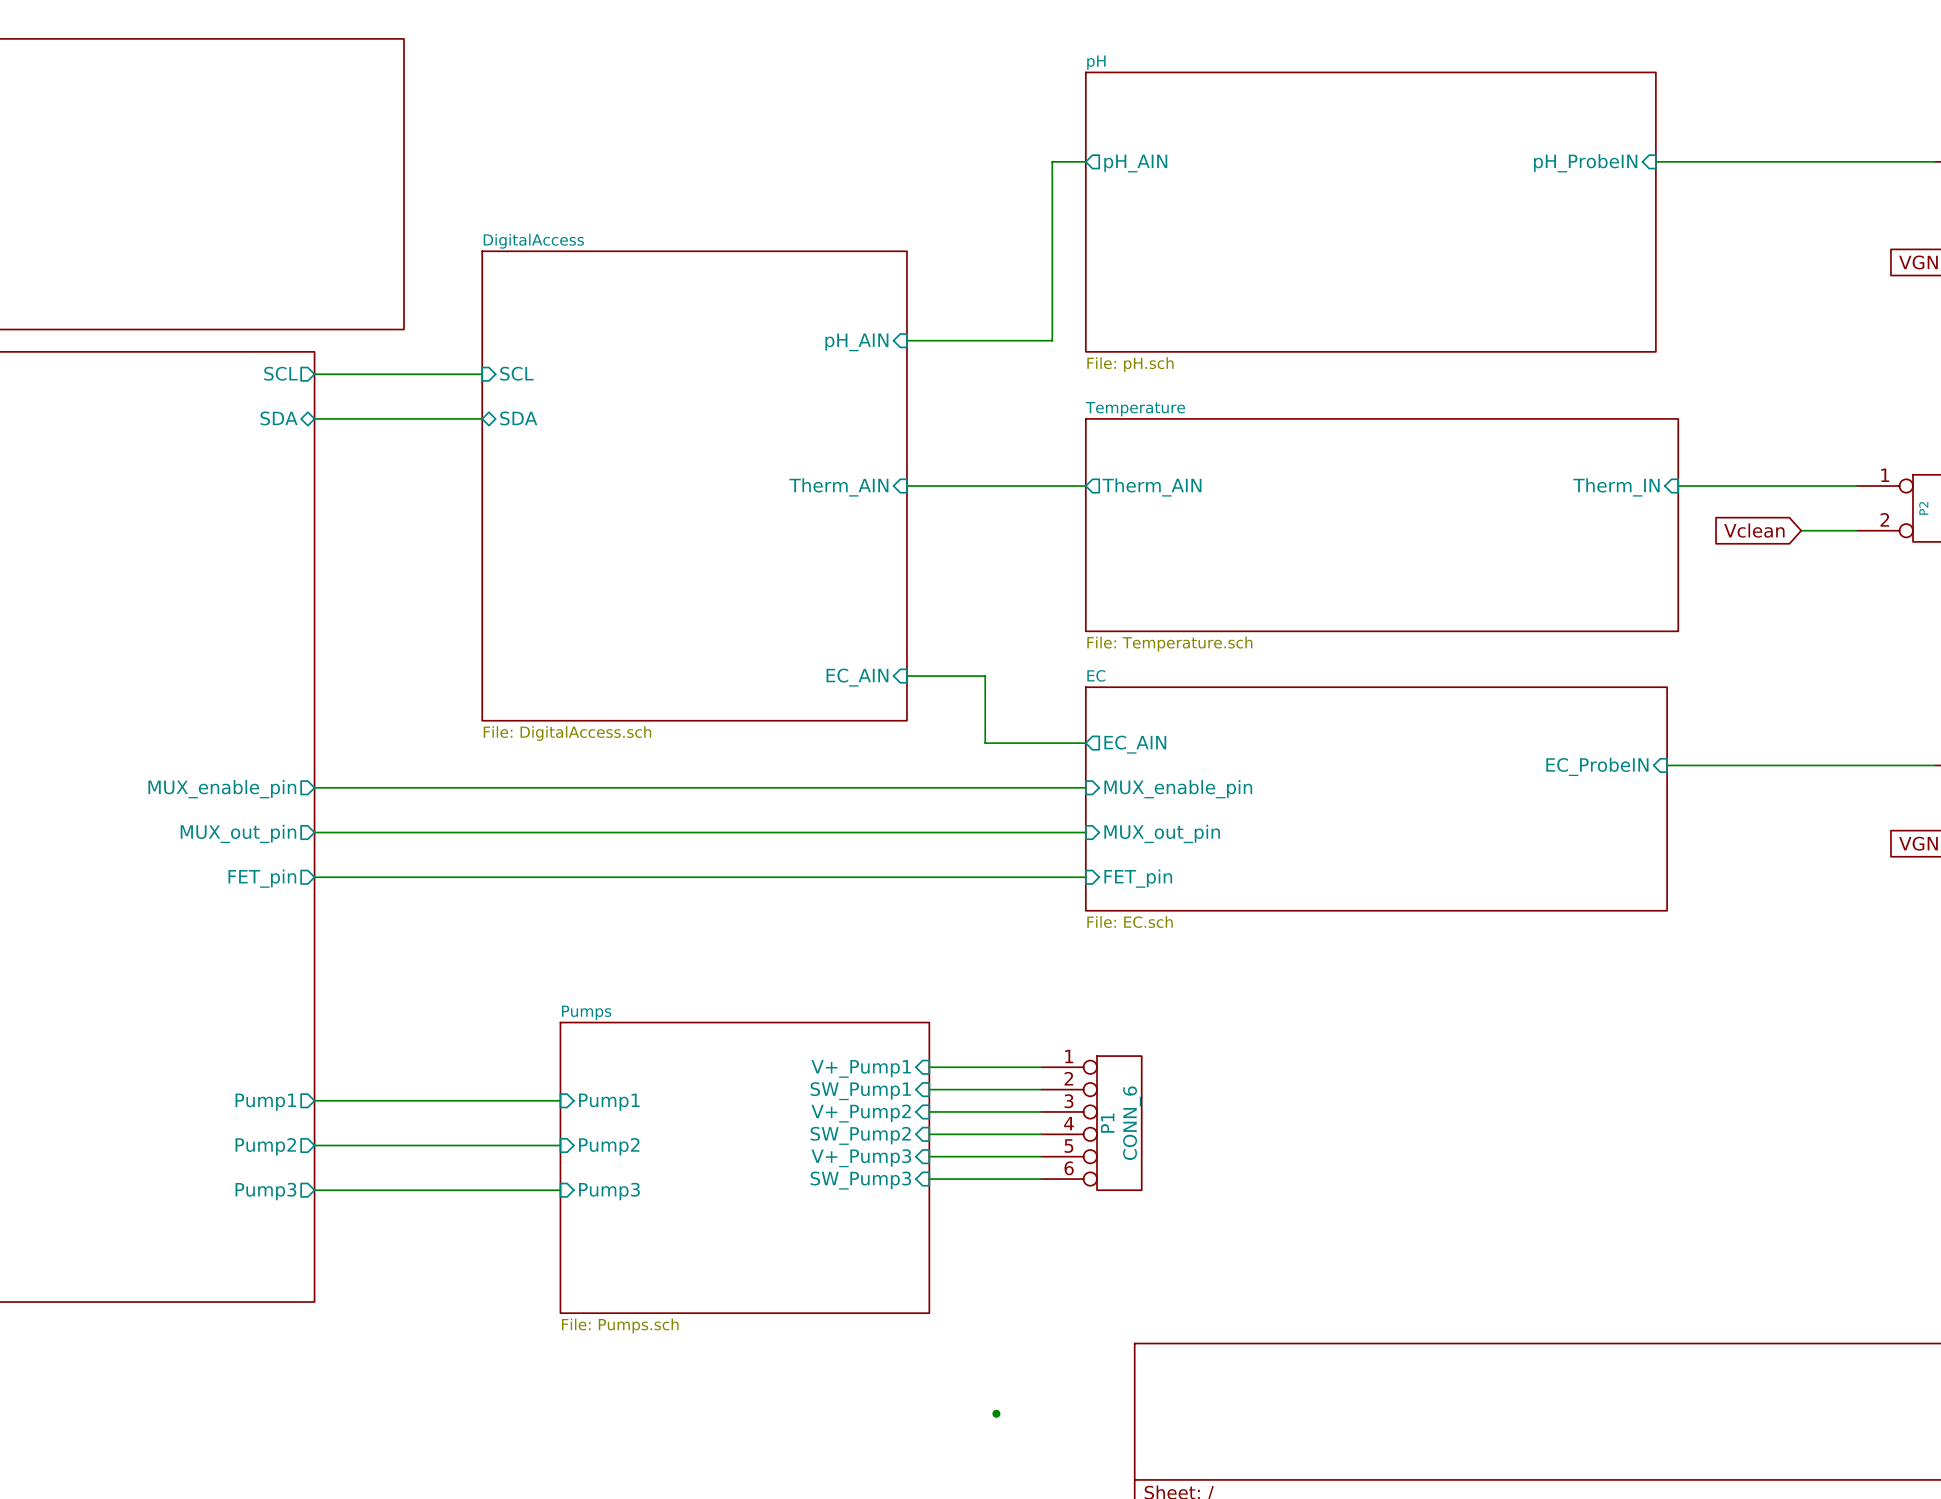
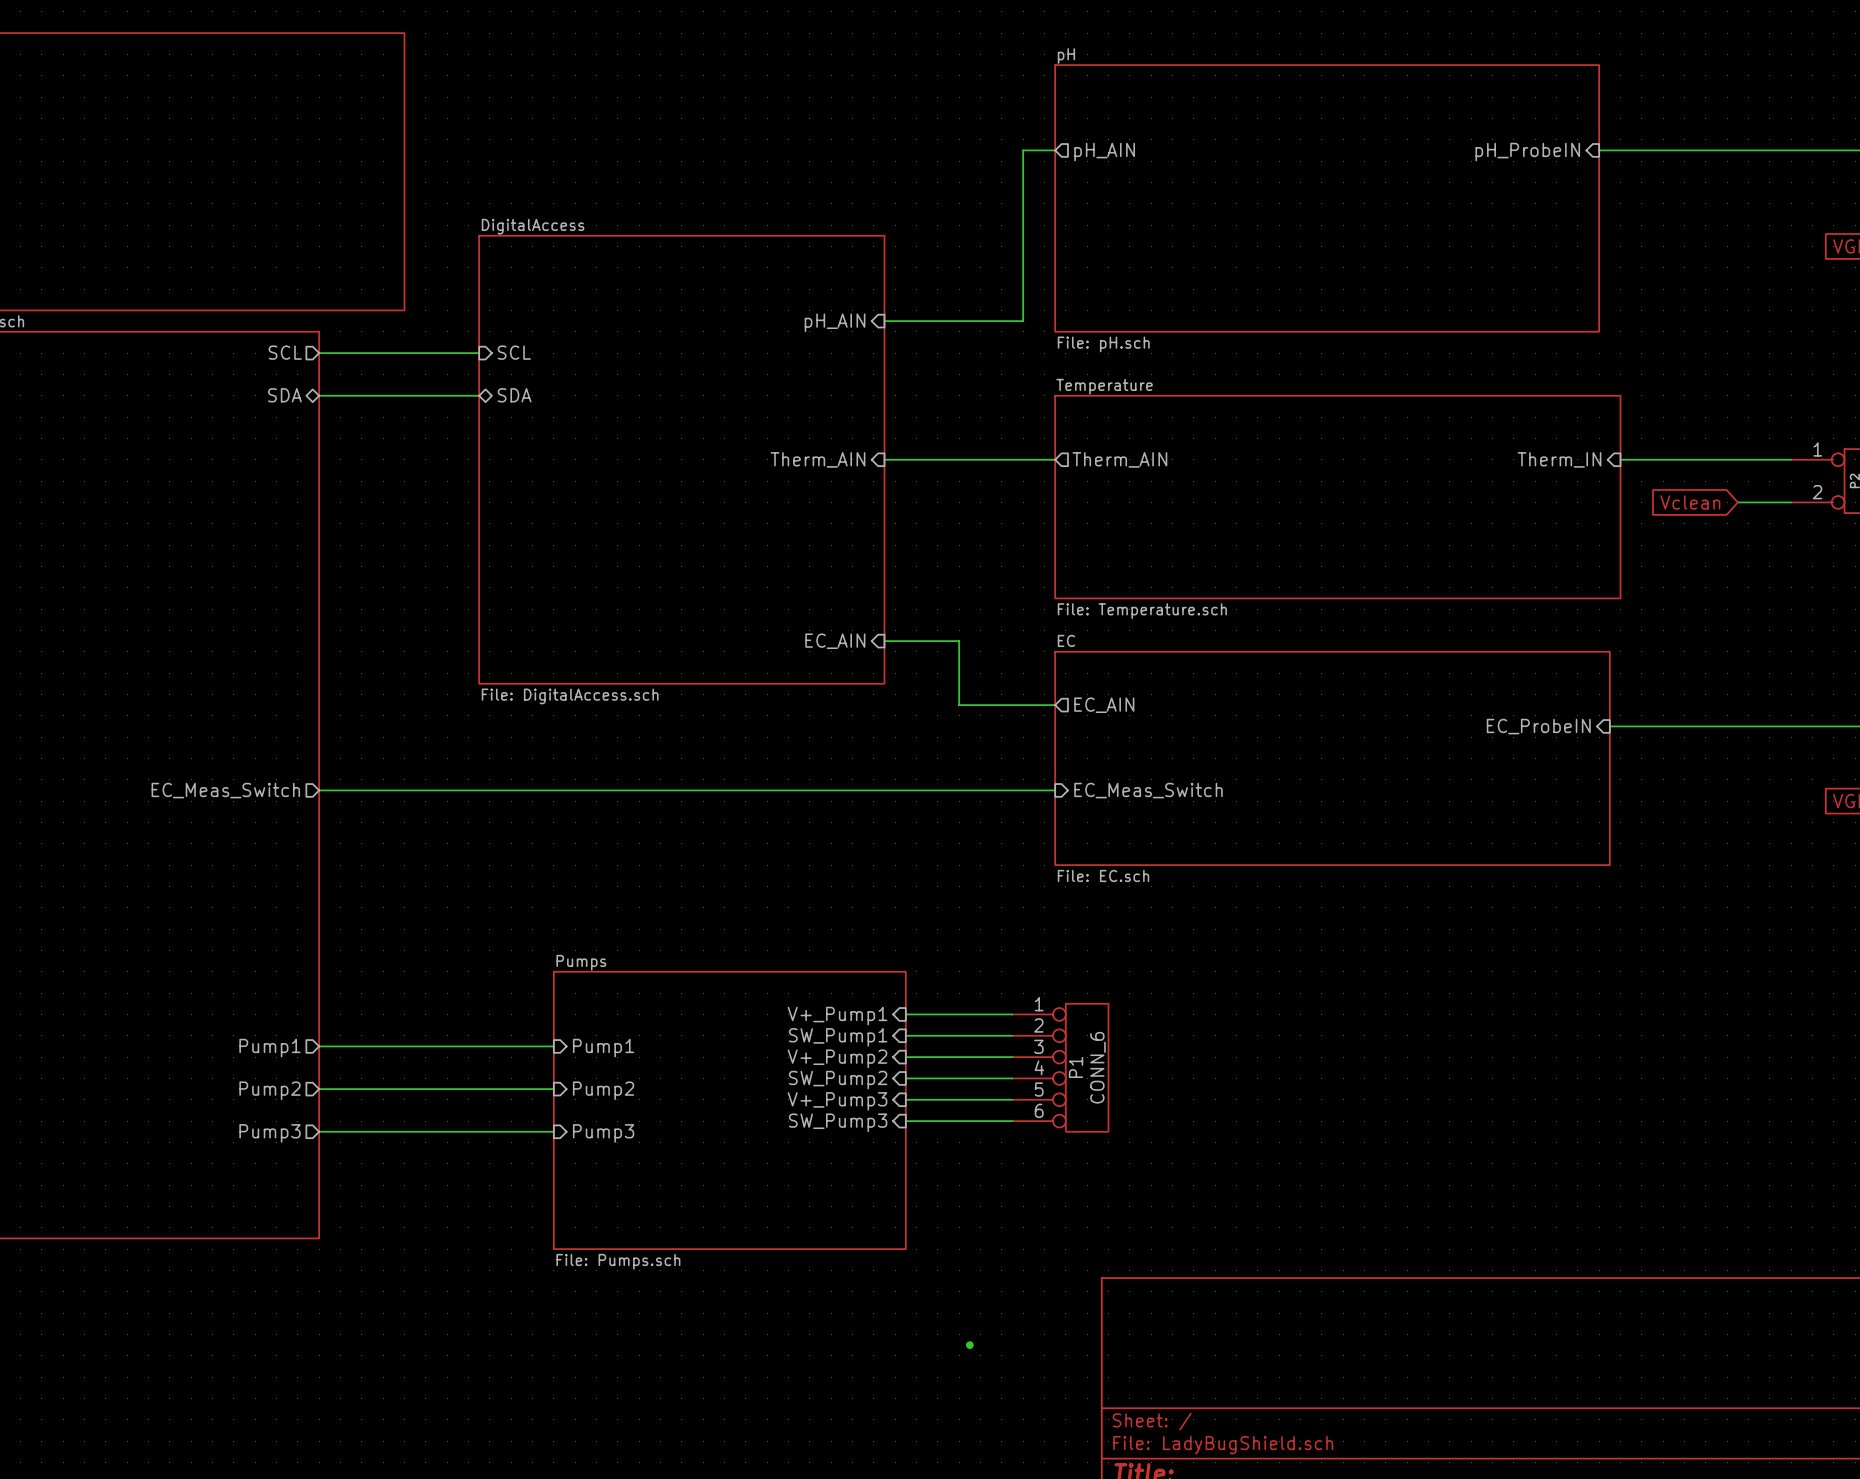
wire: (314, 787) (1085, 787) -> none
sheet pin: MUX_enable_pin (222, 789) -> none
sheet pin: MUX_enable_pin (1178, 789) -> none
sheet pin: MUX_out_pin (238, 833) -> EC_Meas_Switch (225, 790)
sheet pin: MUX_out_pin (1162, 833) -> EC_Meas_Switch (1148, 790)
wire: (314, 877) (1085, 877) -> none
sheet pin: FET_pin (262, 878) -> none
sheet pin: FET_pin (1138, 878) -> none

